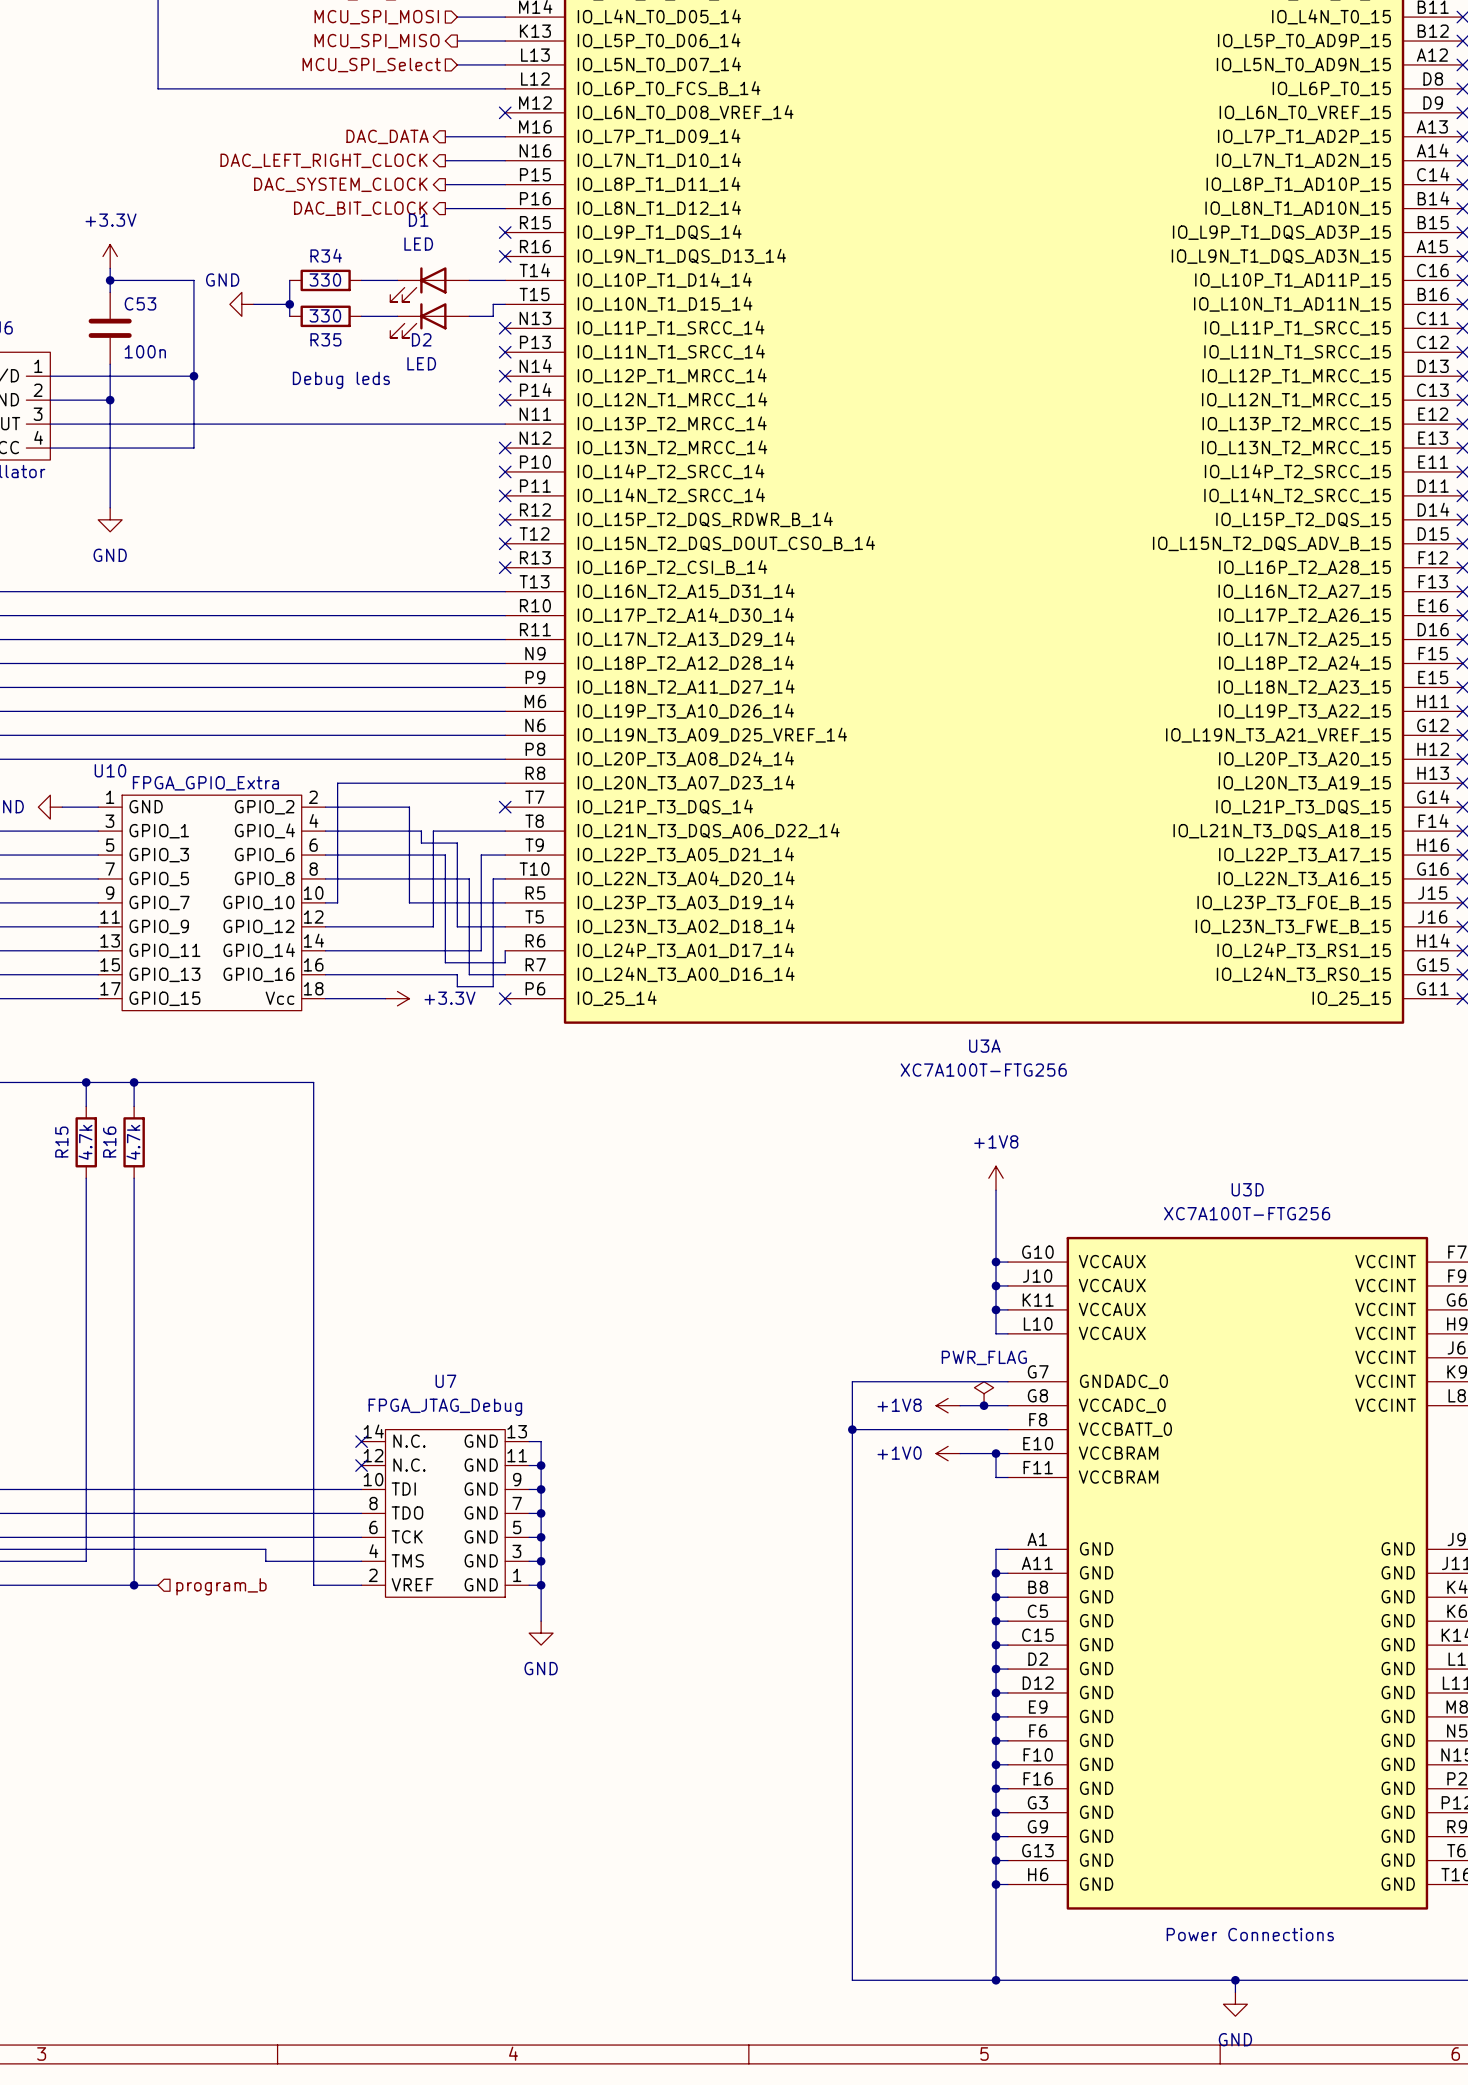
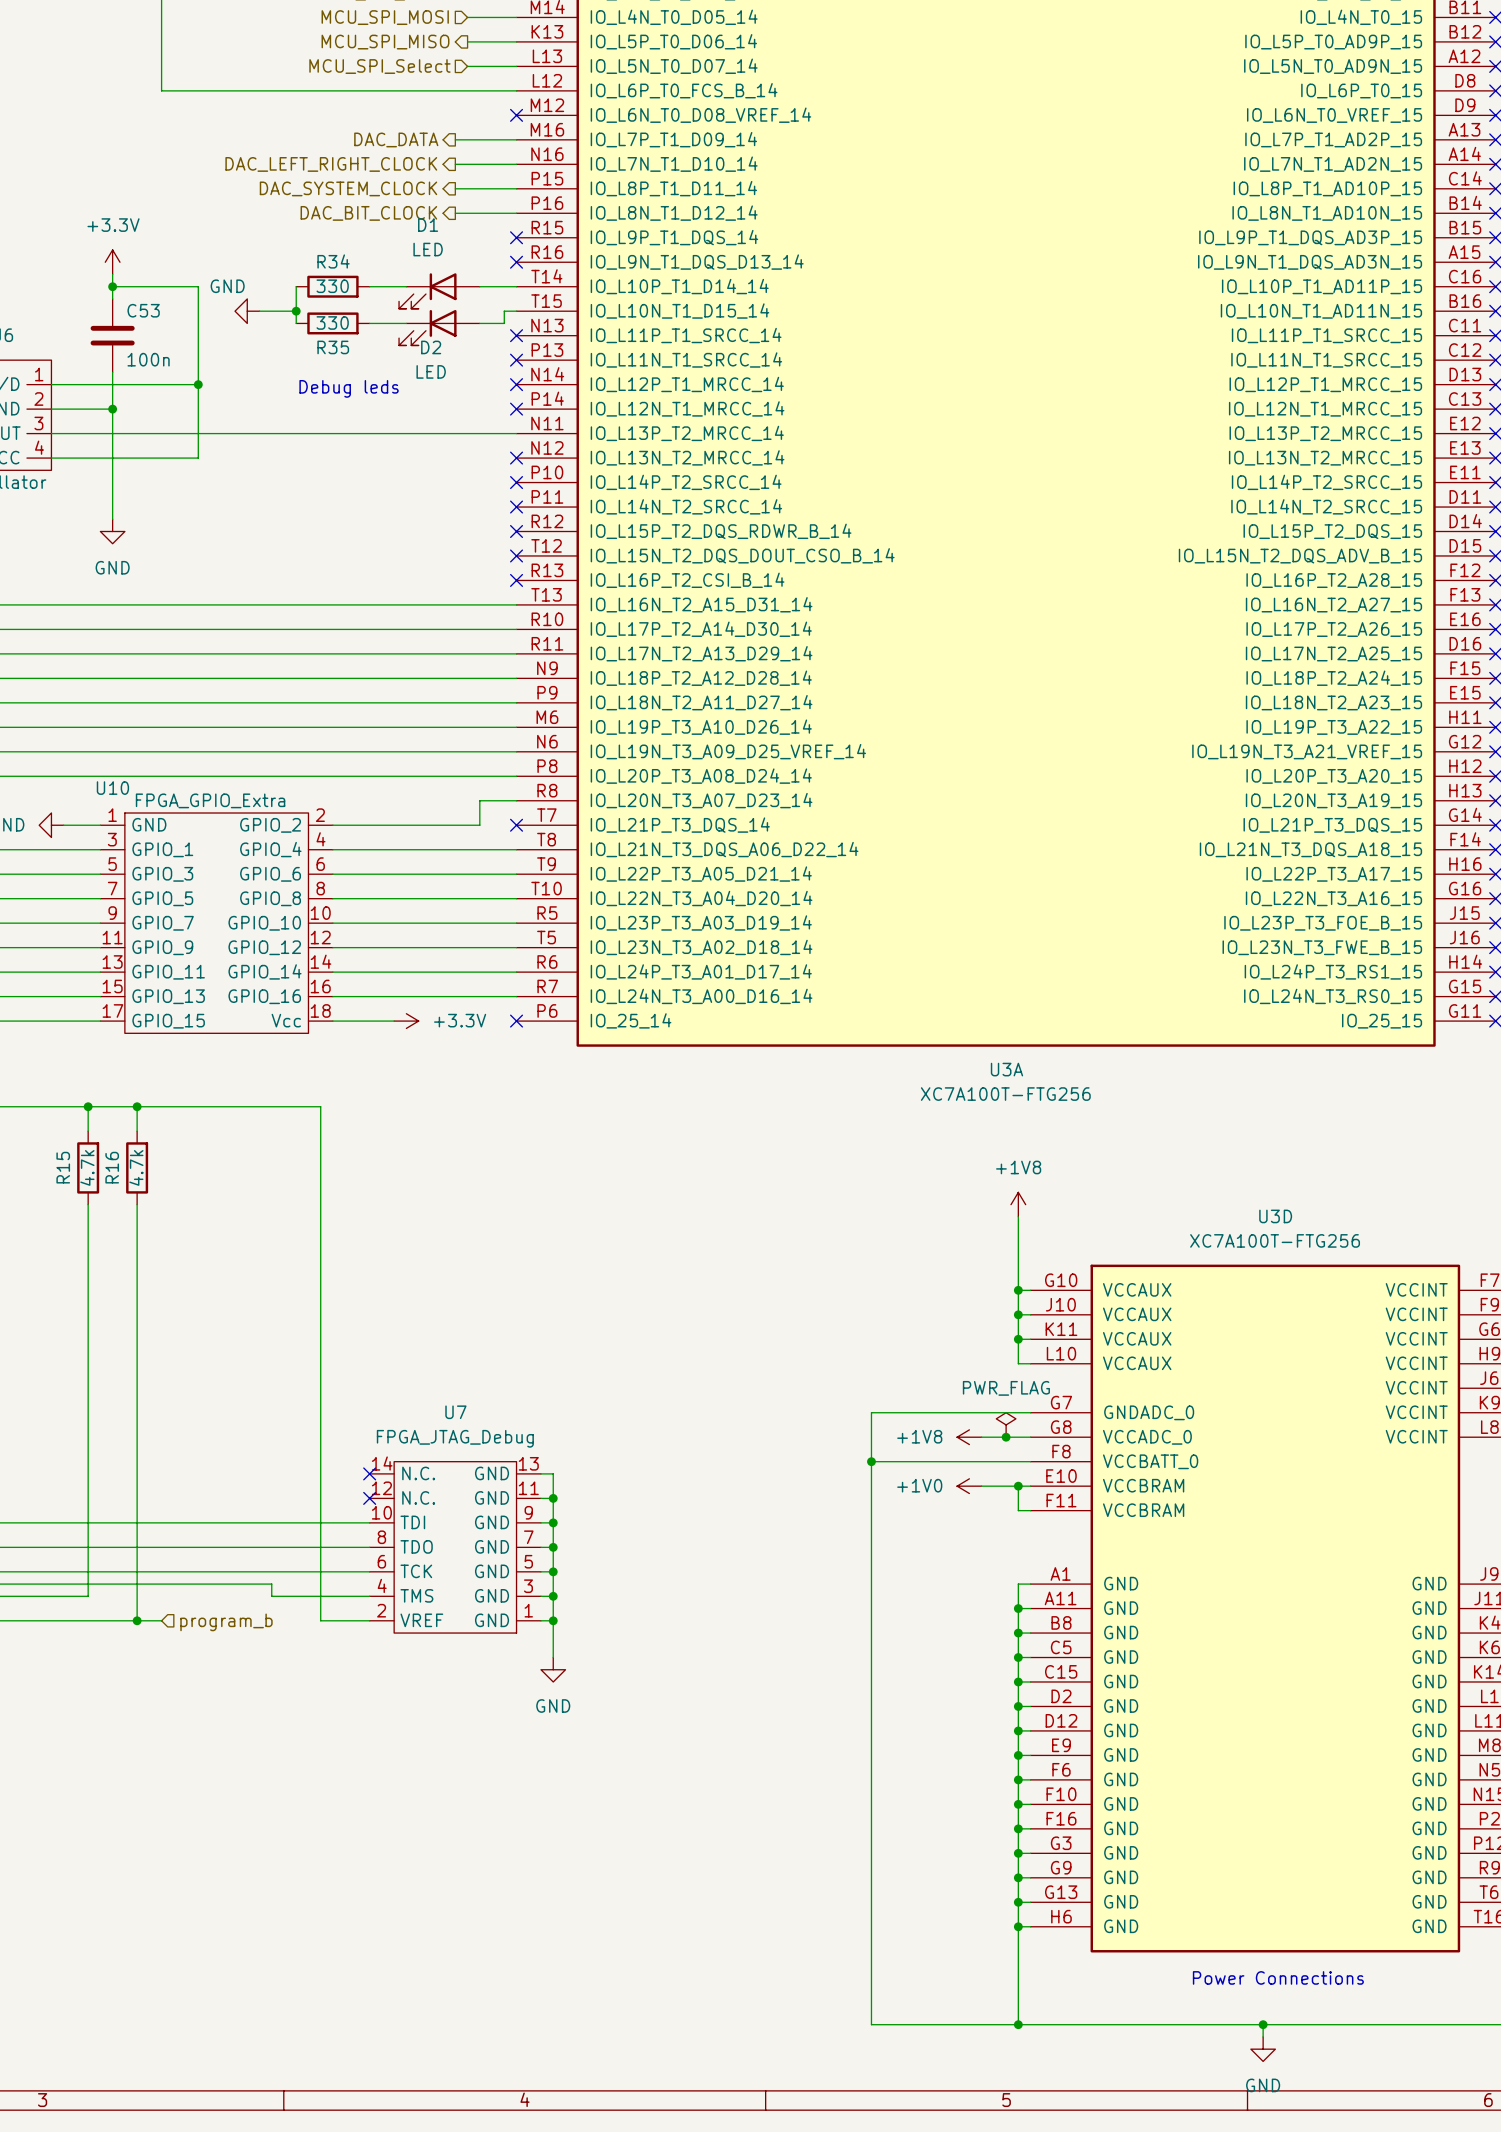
wire: (469, 783) (337, 783) (337, 902) -> (479, 800) (479, 825) (418, 825)
wire: (409, 807) (409, 902) -> (345, 923) (418, 923)
wire: (421, 831) (421, 843) (457, 843) (457, 926) -> (443, 947) (467, 947)
wire: (433, 831) (433, 926) -> (443, 849) (430, 849)
wire: (445, 855) (445, 962) (505, 962) (505, 950) -> (455, 874) (492, 874)
wire: (481, 855) (481, 950) -> (516, 972) (492, 972)
wire: (469, 878) (469, 974) -> (467, 996) (479, 996)
wire: (493, 878) (493, 986) (457, 986) (457, 974) -> (504, 898) (479, 898)

